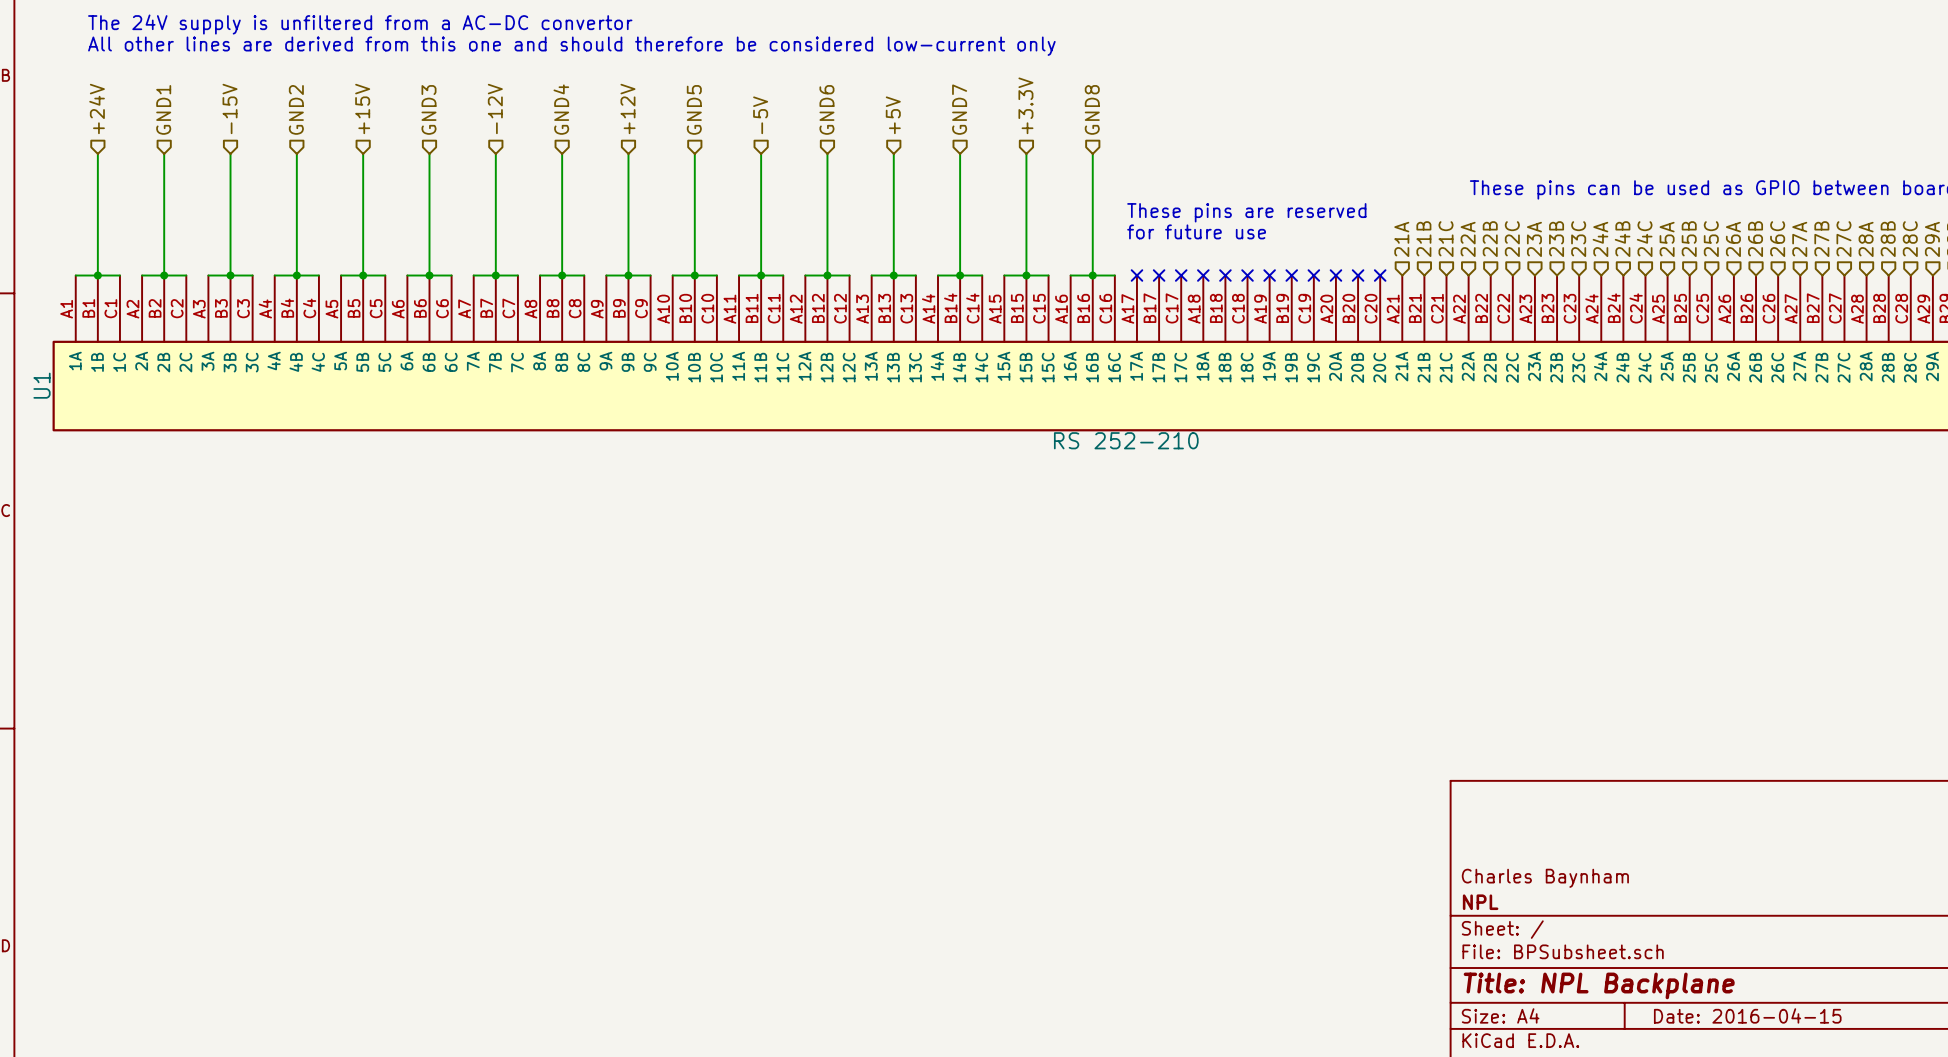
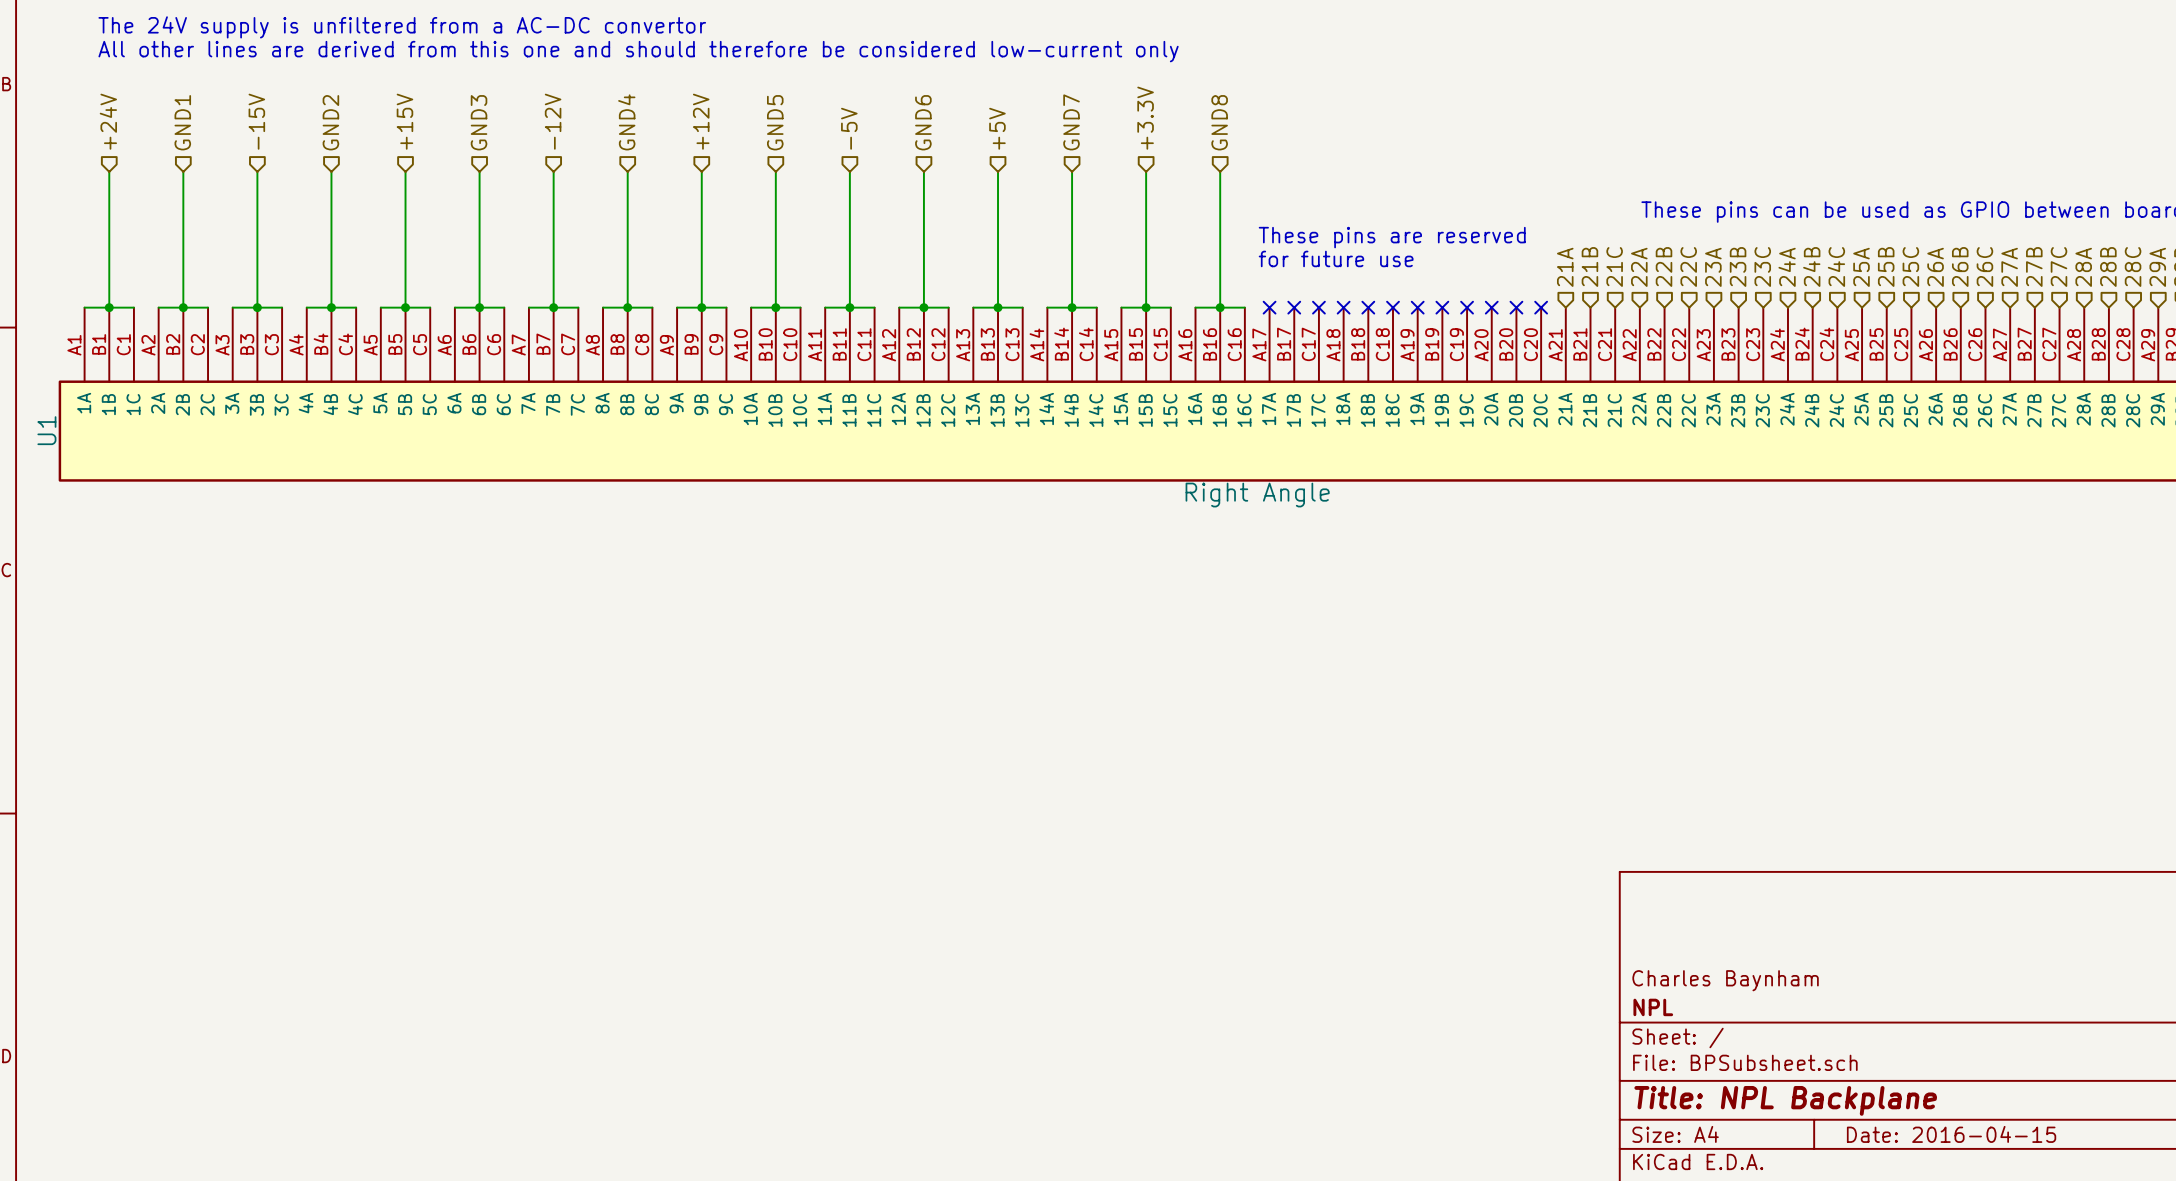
U1 value: RS 252-210 (1126, 440) -> Right Angle (1257, 495)

